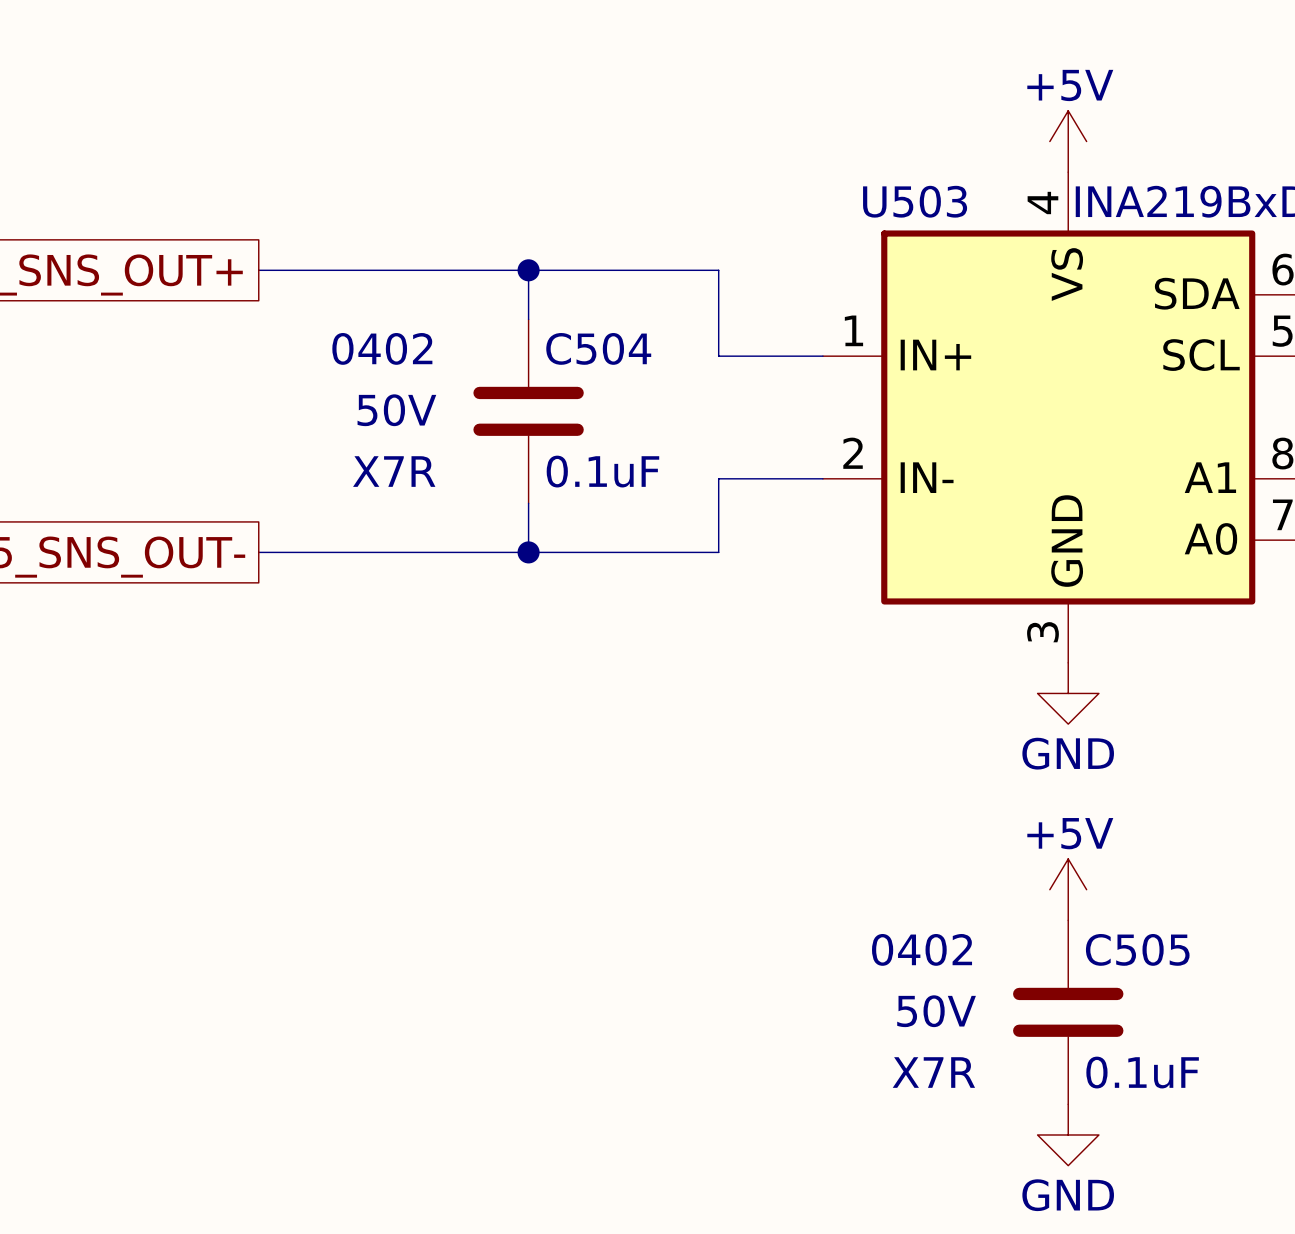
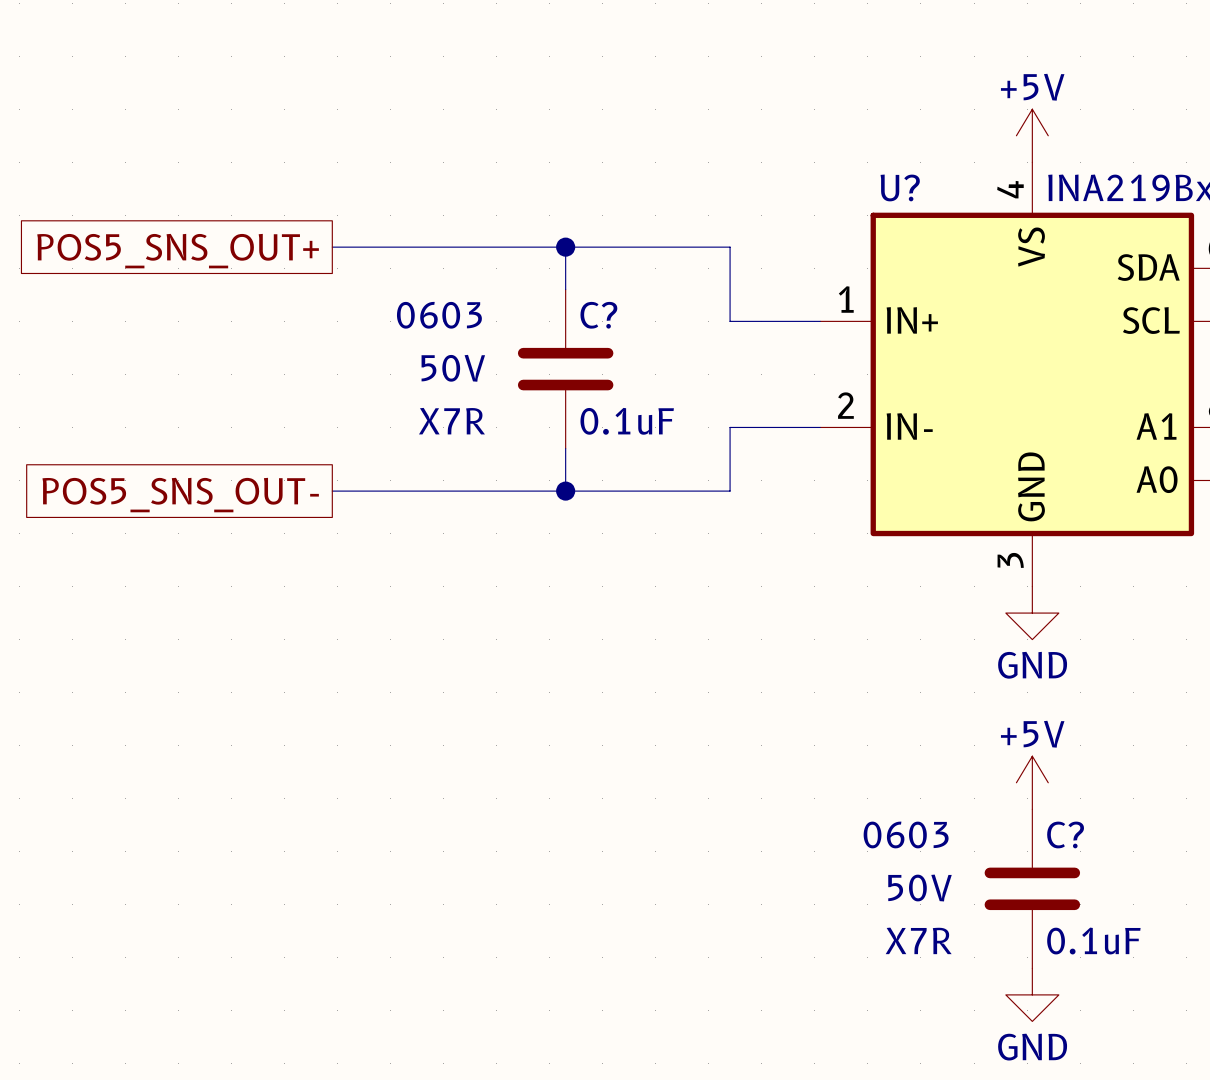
U503 name: U503 (915, 201) -> U? (900, 187)
C504 text: 0402 (382, 348) -> 0603 (439, 315)
C504 name: C504 (598, 348) -> C? (598, 315)
C505 text: 0402 (922, 949) -> 0603 (906, 834)
C505 name: C505 (1137, 949) -> C? (1065, 834)

